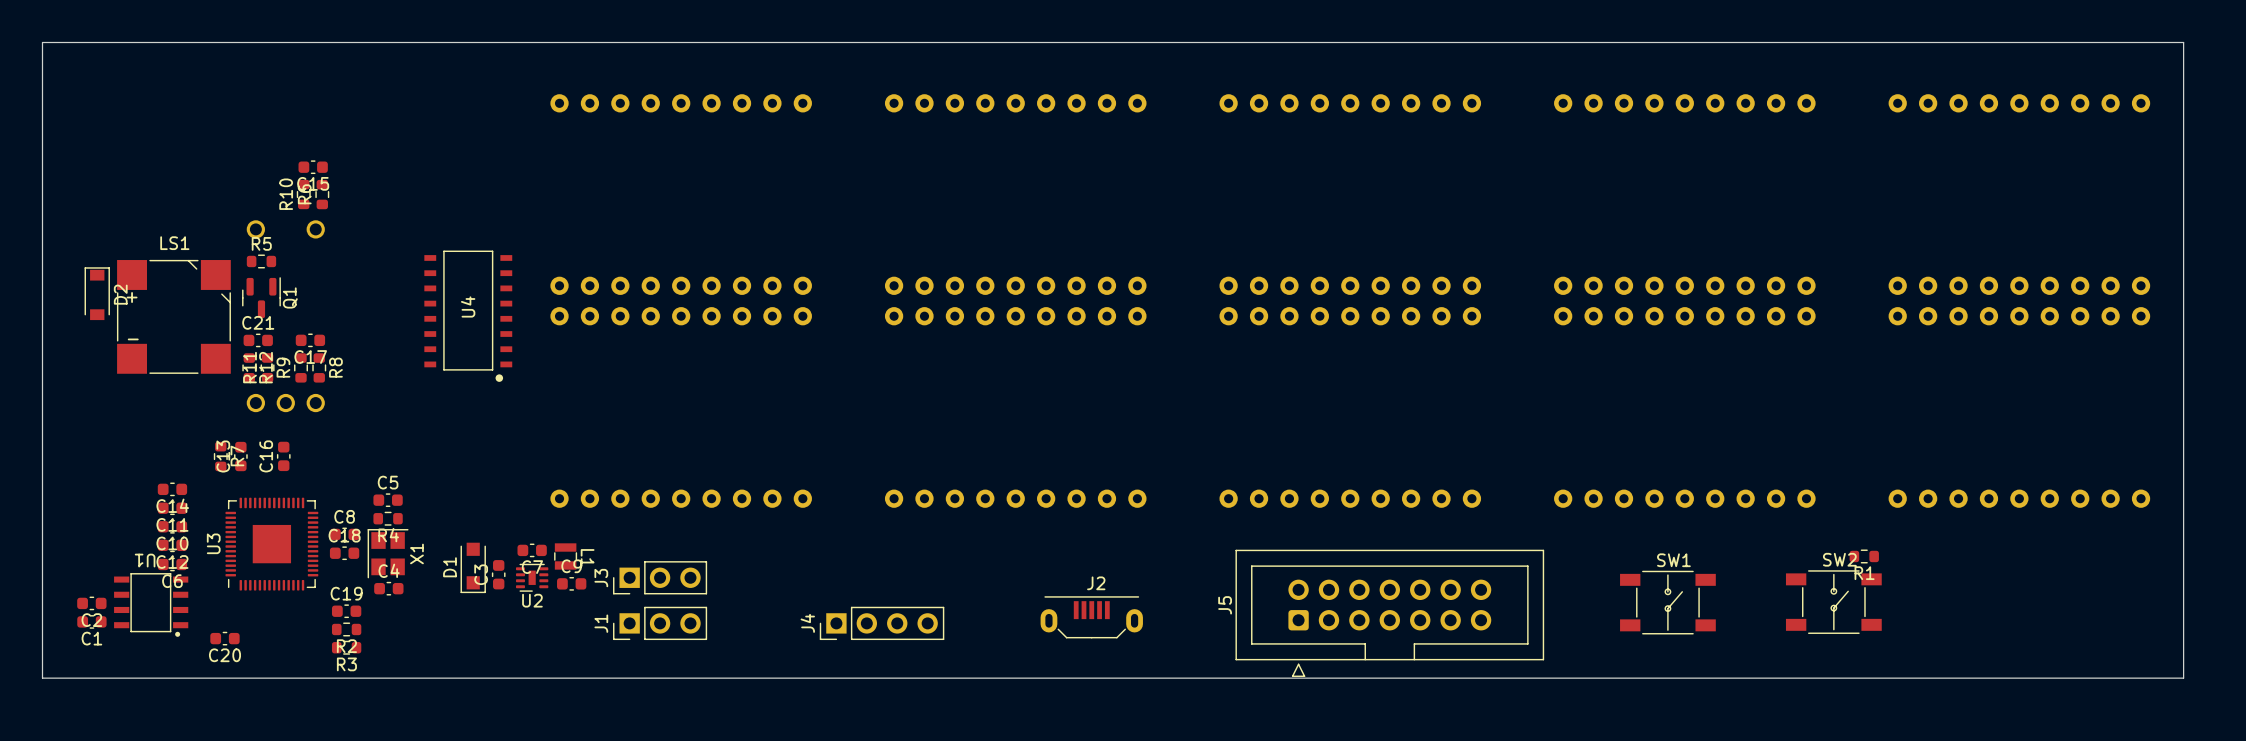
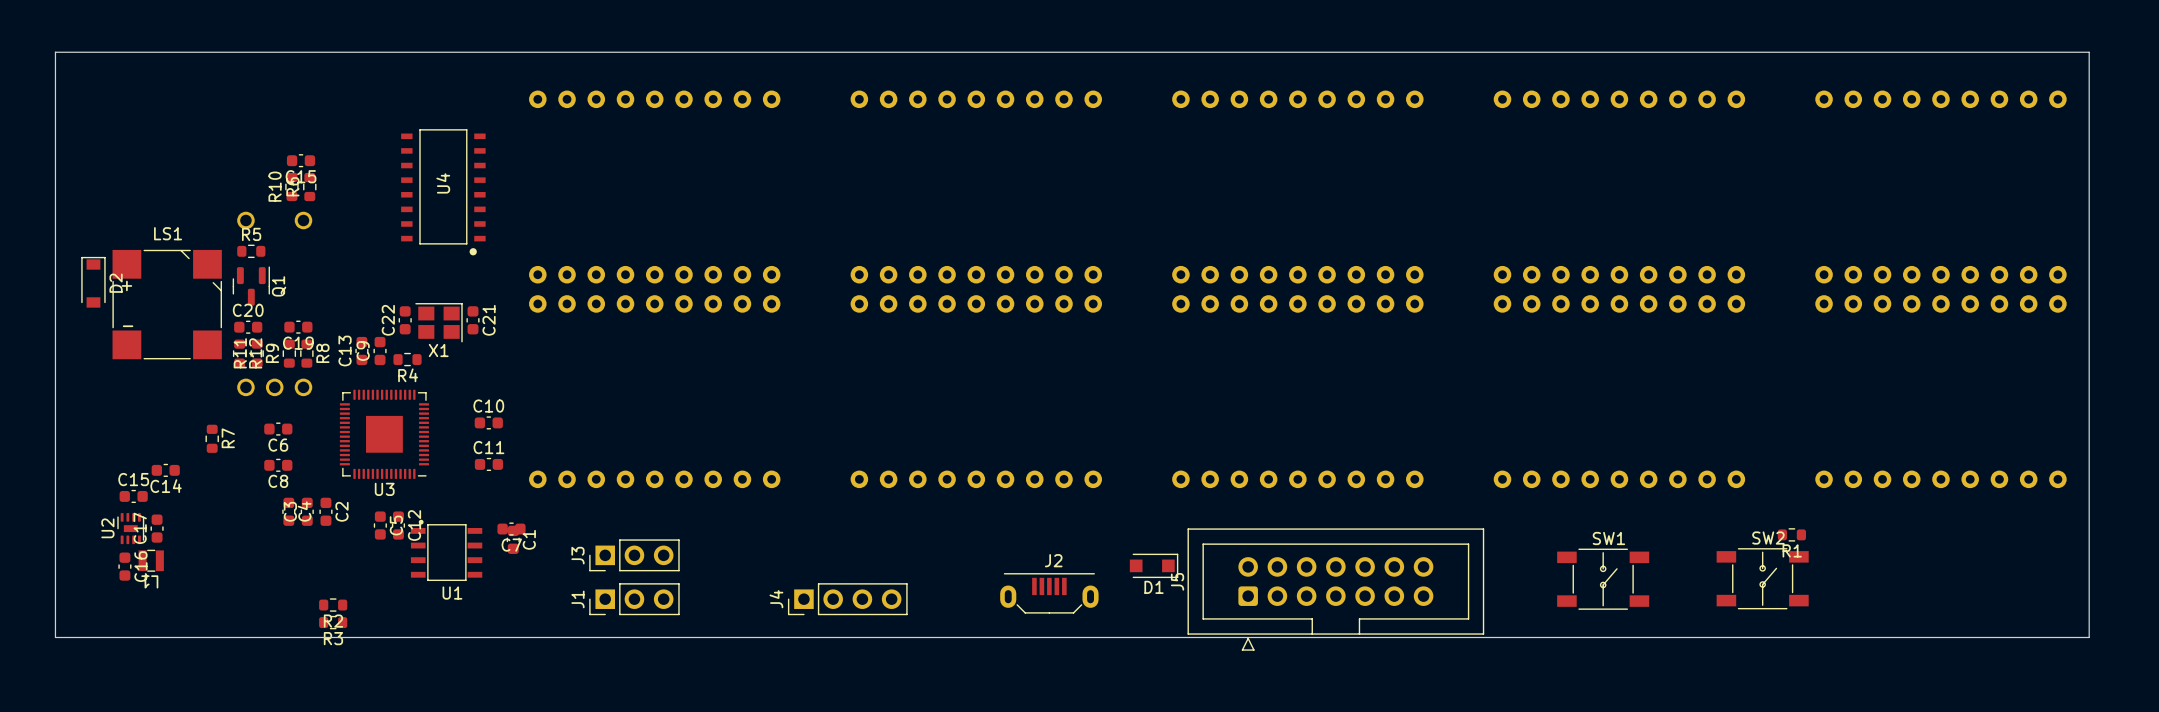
board edge: (42, 42) (2183, 42) (2183, 678) (42, 678) (42, 42) -> (55, 52) (55, 637) (2089, 637) (2089, 52) (55, 52)
U4 position: (468, 316) -> (443, 192)
C21 name: C21 (258, 322) -> C20 (248, 310)
C22: none -> (405, 320)
C21: none -> (473, 320)
C17 name: C17 (310, 357) -> C19 (298, 343)
C13 position: (240, 456) -> (361, 351)
C16 name position: C16 (266, 456) -> C16 (140, 566)
C16 position: (283, 456) -> (124, 566)
C5 rotation: 0° (388, 500) -> 90° clockwise (380, 525)
C5 position: (388, 500) -> (380, 525)
C11 position: (172, 508) -> (488, 464)
C15: none -> (133, 496)
C8 name position: C8 (344, 516) -> C8 (278, 481)
R4 position: (388, 518) -> (407, 359)
C11 name position: C11 (172, 524) -> C11 (488, 447)
C10 position: (172, 526) -> (488, 422)
C8 position: (344, 534) -> (278, 465)
C10 name position: C10 (172, 543) -> C10 (488, 406)
U3 rotation: 0° (271, 544) -> 90° counterclockwise (384, 434)
U3 position: (271, 544) -> (384, 434)
C12 rotation: 0° (172, 545) -> 90° clockwise (398, 525)
C12 position: (172, 545) -> (398, 525)
C17: none -> (157, 528)
C18: (344, 553) -> none
X1 rotation: 0° (388, 553) -> 90° clockwise (438, 322)
X1 position: (388, 553) -> (438, 322)
L1 rotation: 0° (565, 556) -> 90° clockwise (151, 560)
L1 position: (565, 556) -> (151, 560)
C12 name position: C12 (172, 562) -> C12 (414, 525)
C6 position: (172, 564) -> (278, 429)
C9 name position: C9 (571, 566) -> C9 (363, 351)
D1 rotation: 0° (473, 567) -> 90° counterclockwise (1154, 565)
D1 position: (473, 567) -> (1154, 565)
C3 position: (498, 574) -> (307, 511)
U2 rotation: 0° (532, 577) -> 90° clockwise (130, 528)
U2 position: (532, 577) -> (130, 528)
C9 rotation: 0° (571, 583) -> 90° clockwise (380, 351)
C9 position: (571, 583) -> (380, 351)
C4 rotation: 0° (388, 588) -> 90° clockwise (288, 511)
C4 position: (388, 588) -> (288, 511)
C2 rotation: 0° (91, 603) -> 90° clockwise (325, 511)
C2 position: (91, 603) -> (325, 511)
U1 rotation: 0° (151, 604) -> 180° (446, 550)
U1 position: (151, 604) -> (446, 550)
C19: (346, 611) -> none
C2 name position: C2 (91, 620) -> C2 (341, 511)
C1 rotation: 0° (91, 621) -> 90° clockwise (513, 539)
C1 position: (91, 621) -> (513, 539)
C1 name position: C1 (91, 638) -> C1 (529, 539)
C20: (224, 638) -> none

